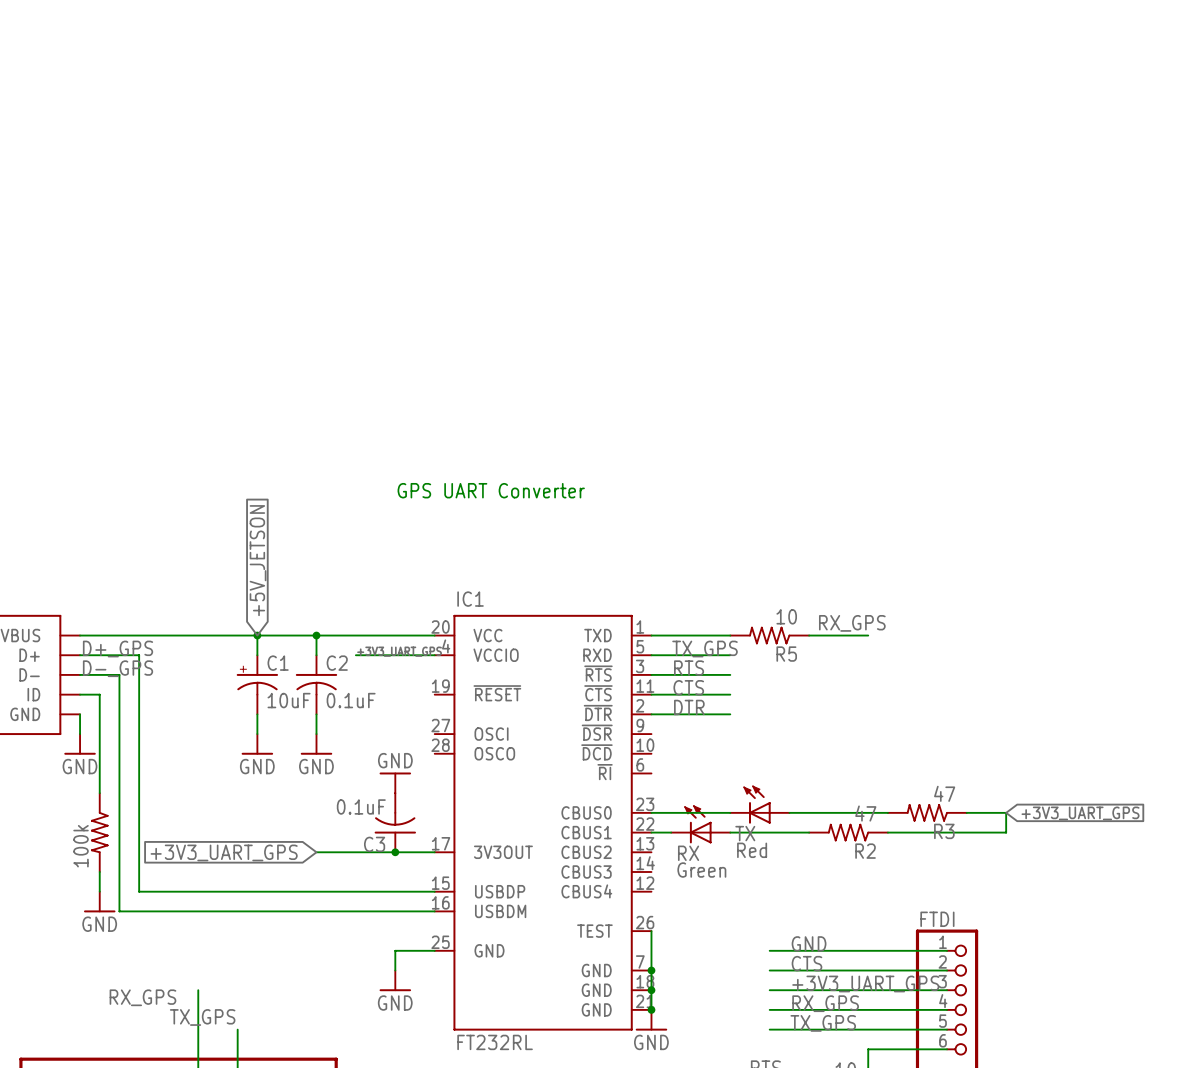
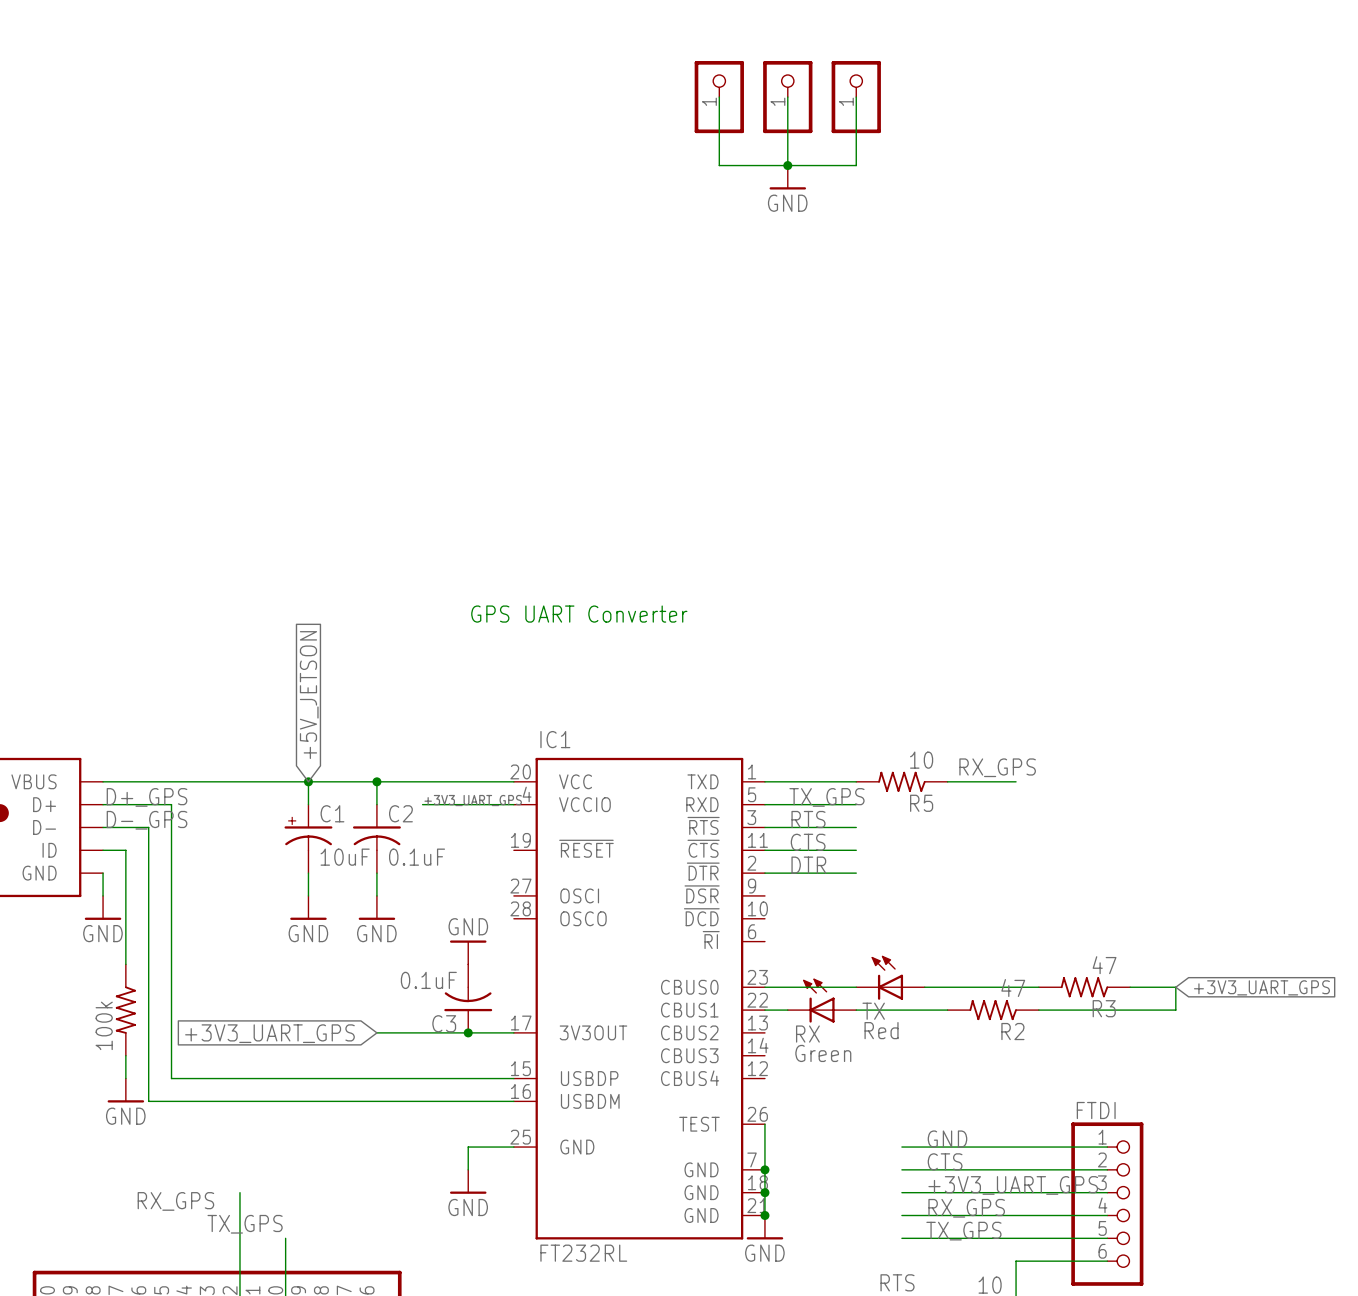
wire: none -> (719, 97) (719, 165) (856, 165) (856, 97)
part: none -> (719, 97)
wire: none -> (787, 97) (787, 165)
part: none -> (787, 97)
part: none -> (856, 97)
junction: none -> (787, 165)
power symbol: none -> GND (787, 177)

